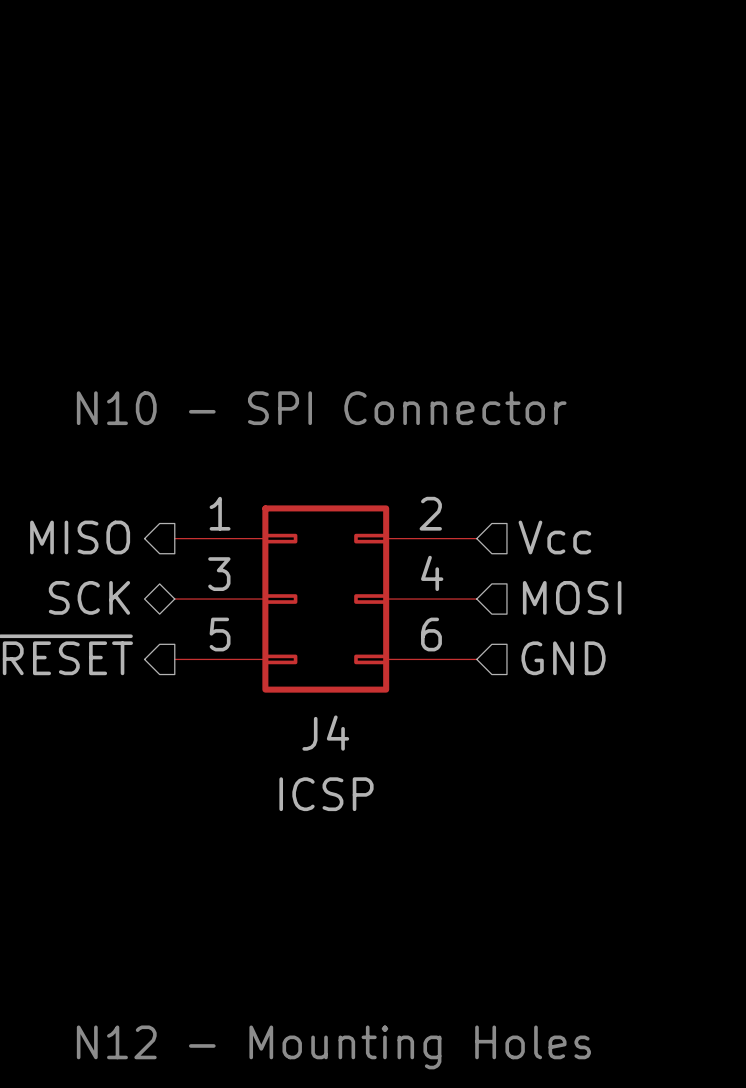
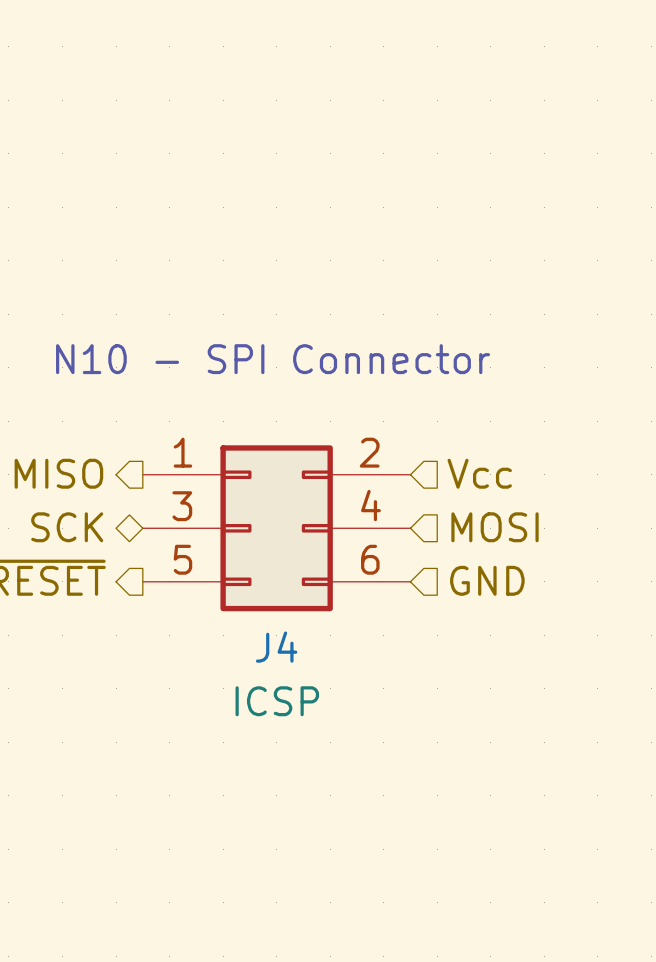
text: N12 - Mounting Holes (333, 1047) -> none

